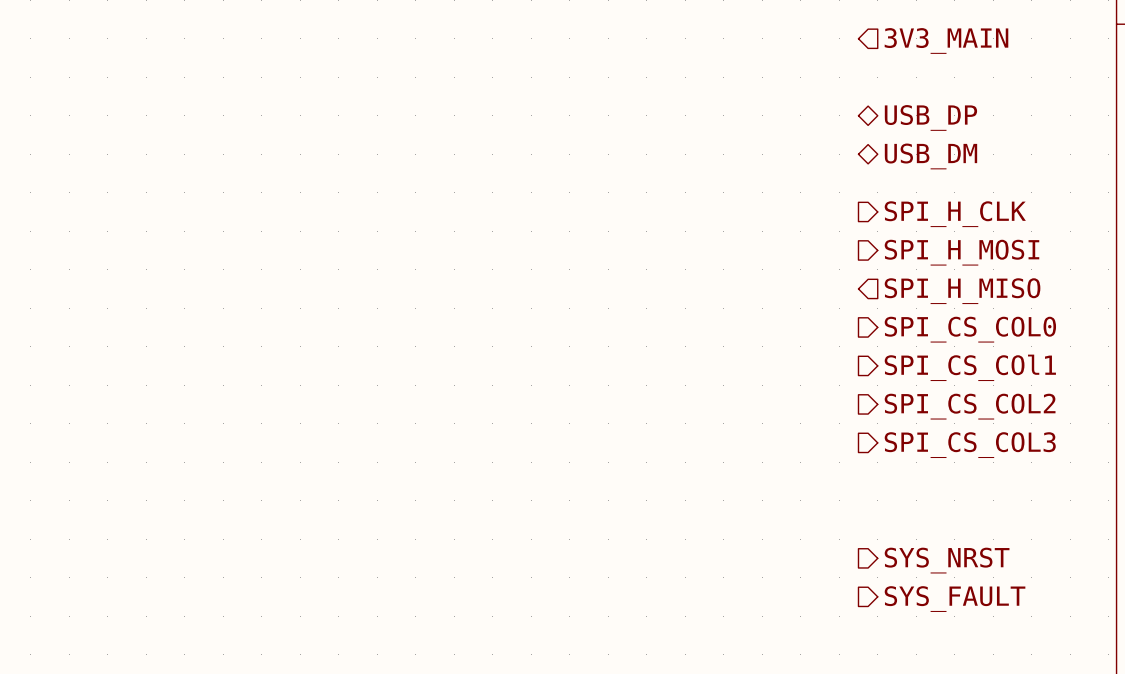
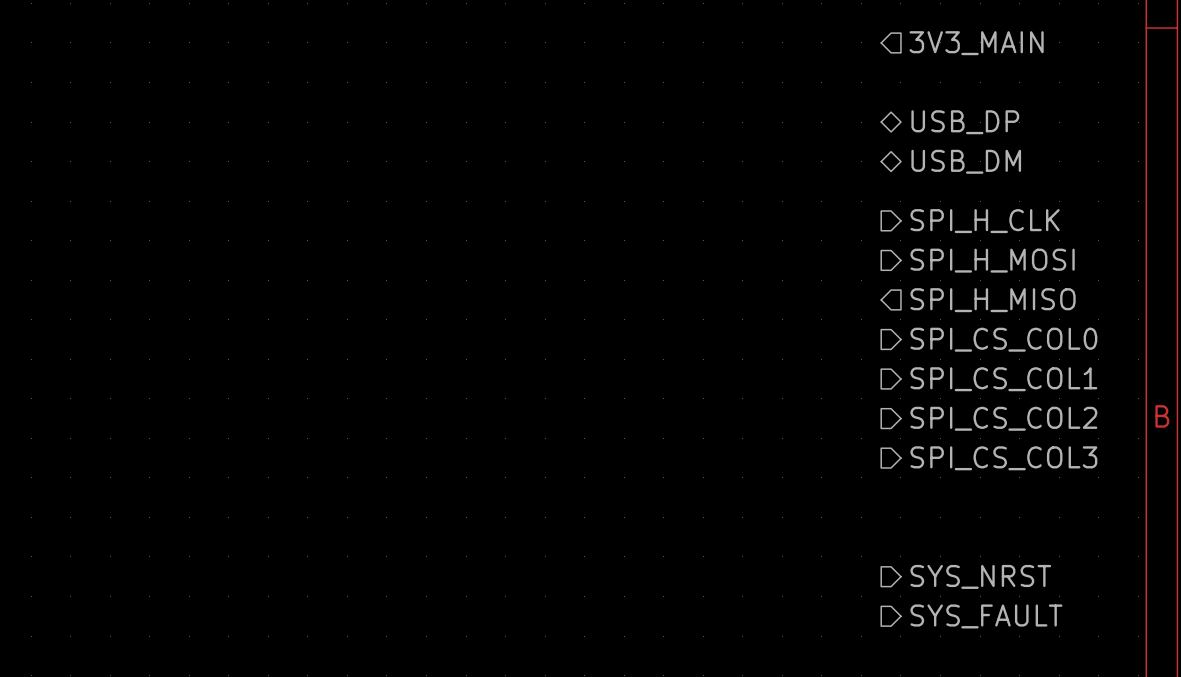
hierarchical label: SPI_CS_COl1 (970, 367) -> SPI_CS_COL1 (1003, 379)

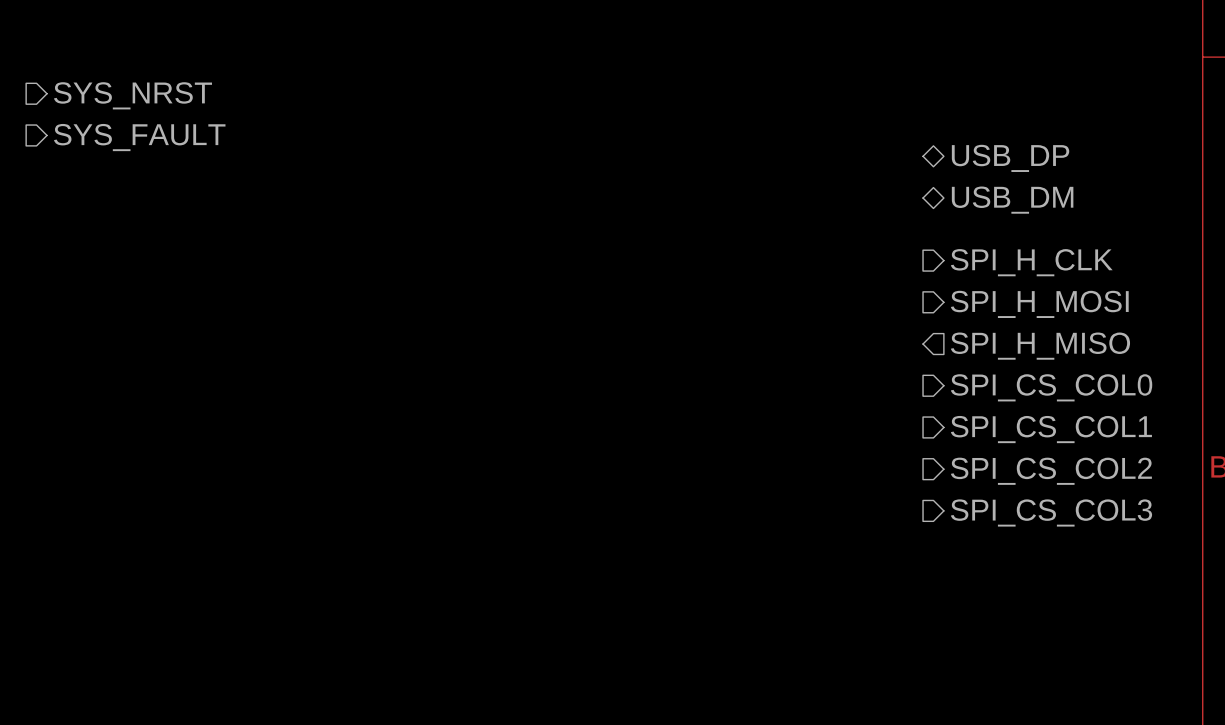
hierarchical label: 3V3_MAIN (976, 43) -> none
hierarchical label: none -> SYS_NRST (133, 95)
hierarchical label: none -> SYS_FAULT (139, 137)
hierarchical label: SYS_NRST (980, 576) -> none
hierarchical label: SYS_FAULT (986, 616) -> none

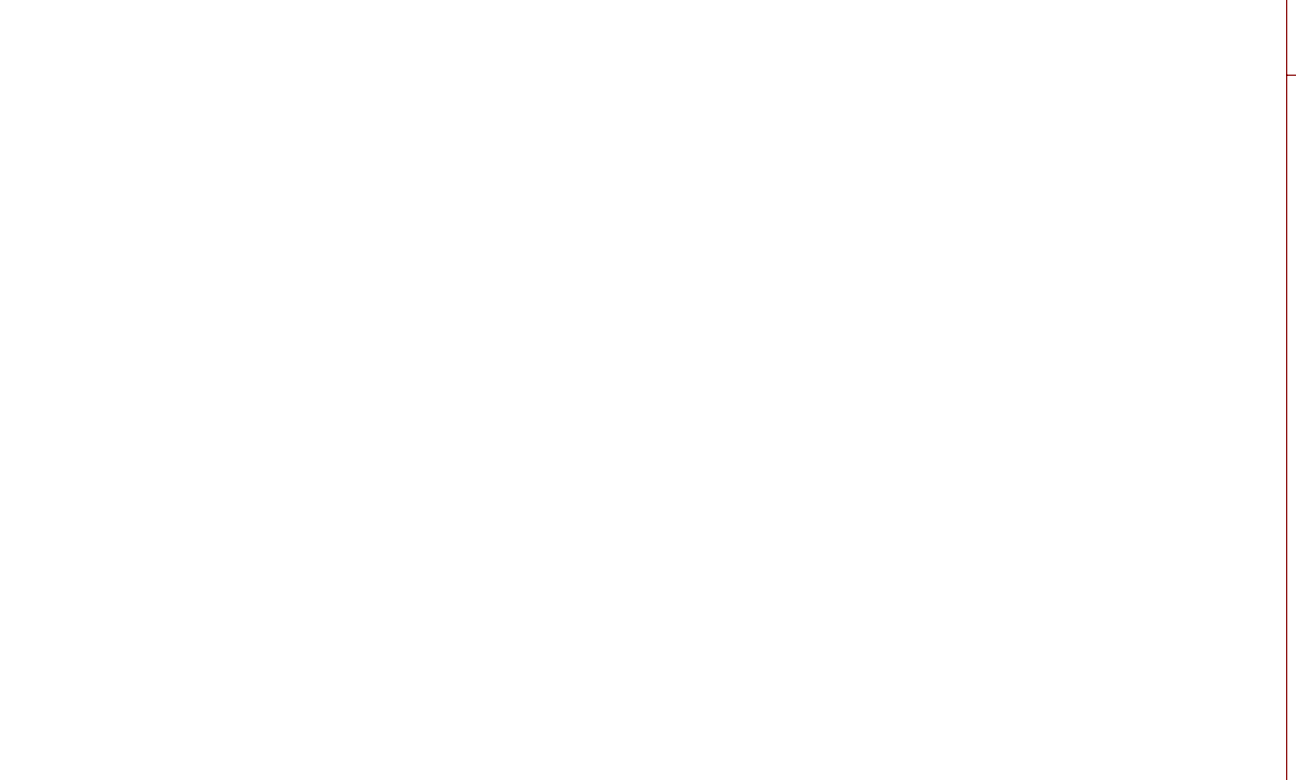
hierarchical label: SYS_NRST (133, 95) -> none
hierarchical label: SYS_FAULT (139, 137) -> none
hierarchical label: USB_DP (1010, 158) -> none
hierarchical label: USB_DM (1012, 200) -> none
hierarchical label: SPI_H_CLK (1031, 262) -> none
hierarchical label: SPI_H_MOSI (1039, 304) -> none
hierarchical label: SPI_H_MISO (1040, 346) -> none
hierarchical label: SPI_CS_COL0 (1051, 387) -> none
hierarchical label: SPI_CS_COL1 (1051, 429) -> none
hierarchical label: SPI_CS_COL2 (1051, 471) -> none
hierarchical label: SPI_CS_COL3 (1051, 512) -> none

